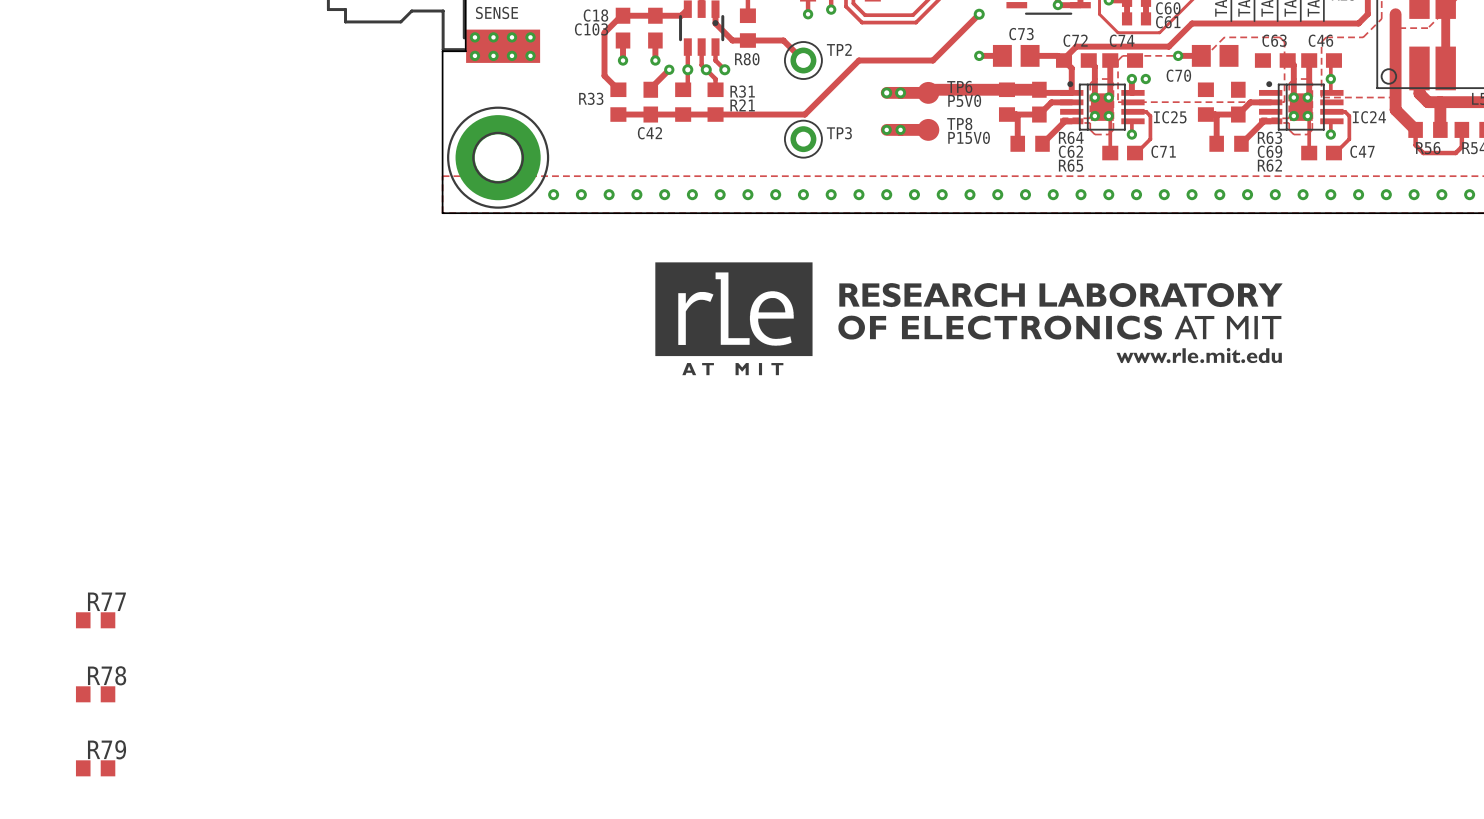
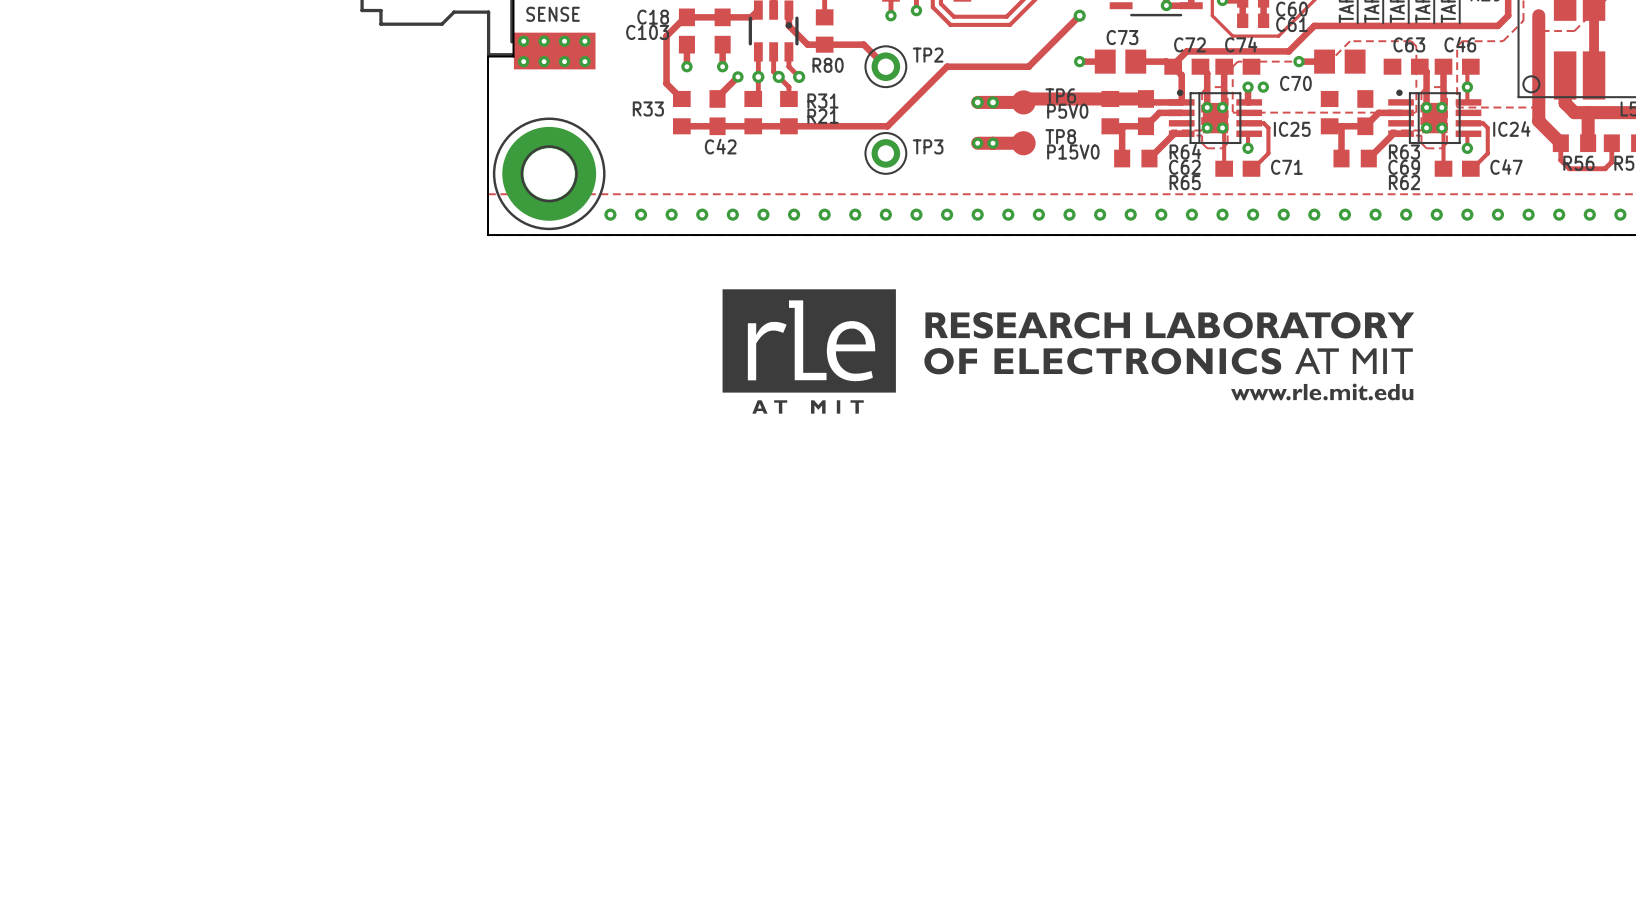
R77: (95, 620) -> none
R78: (95, 694) -> none
R79: (95, 768) -> none

